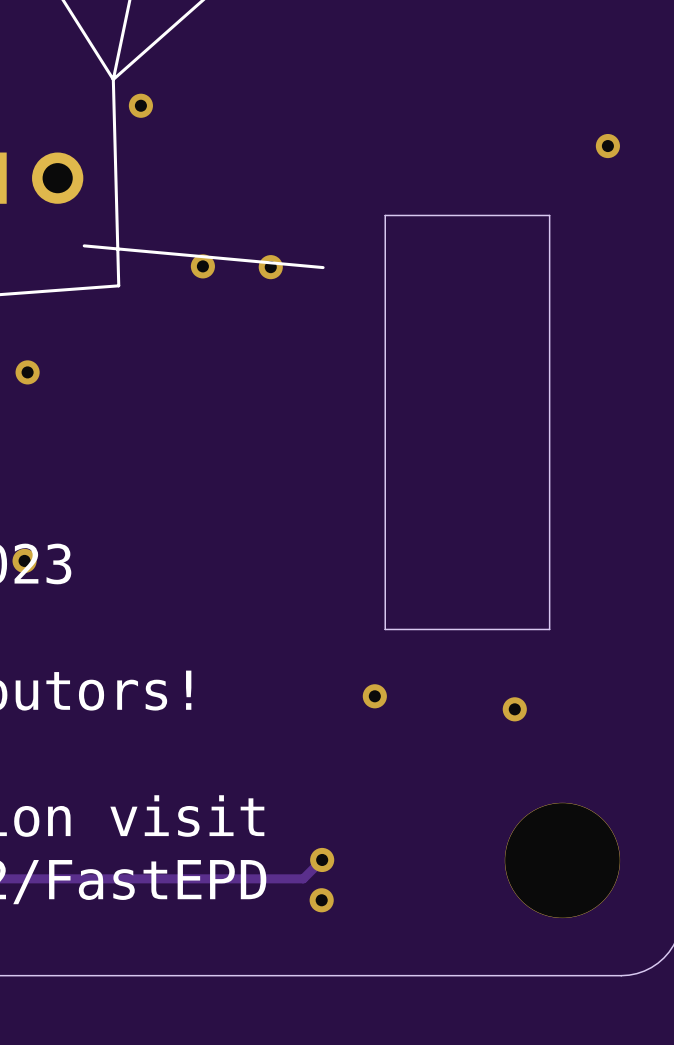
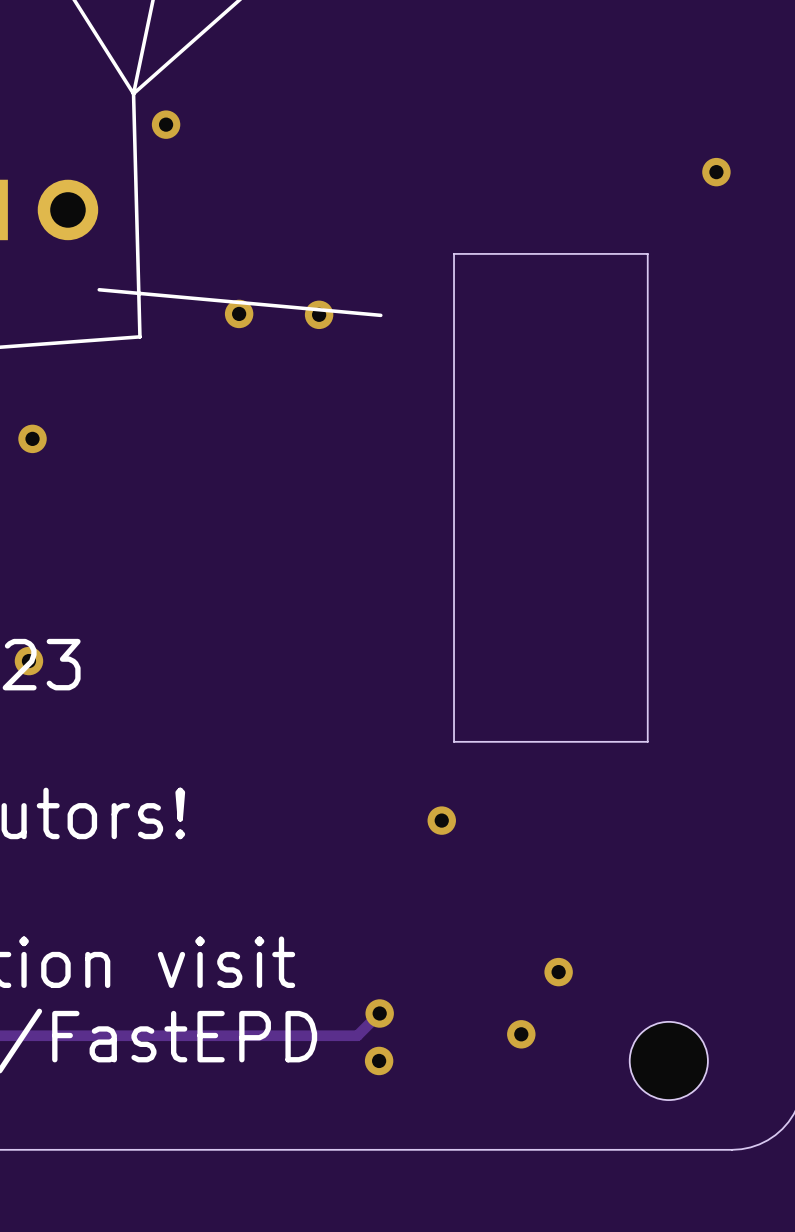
via: (514, 709) -> none
via: none -> (558, 972)
part: (562, 860) -> none
via: none -> (521, 1034)
part: none -> (668, 1060)

